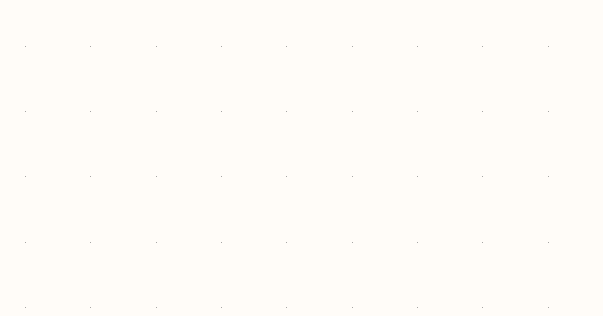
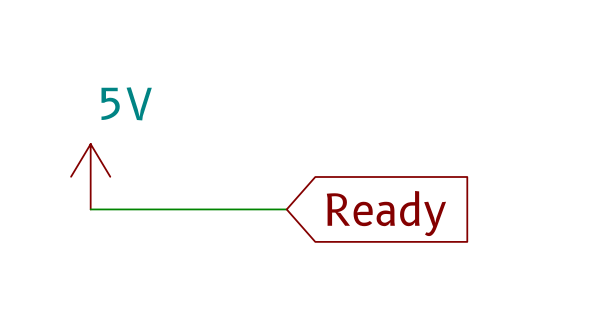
power symbol: none -> 5V (90, 176)
wire: none -> (90, 209) (286, 209)
global label: none -> Ready (386, 213)

